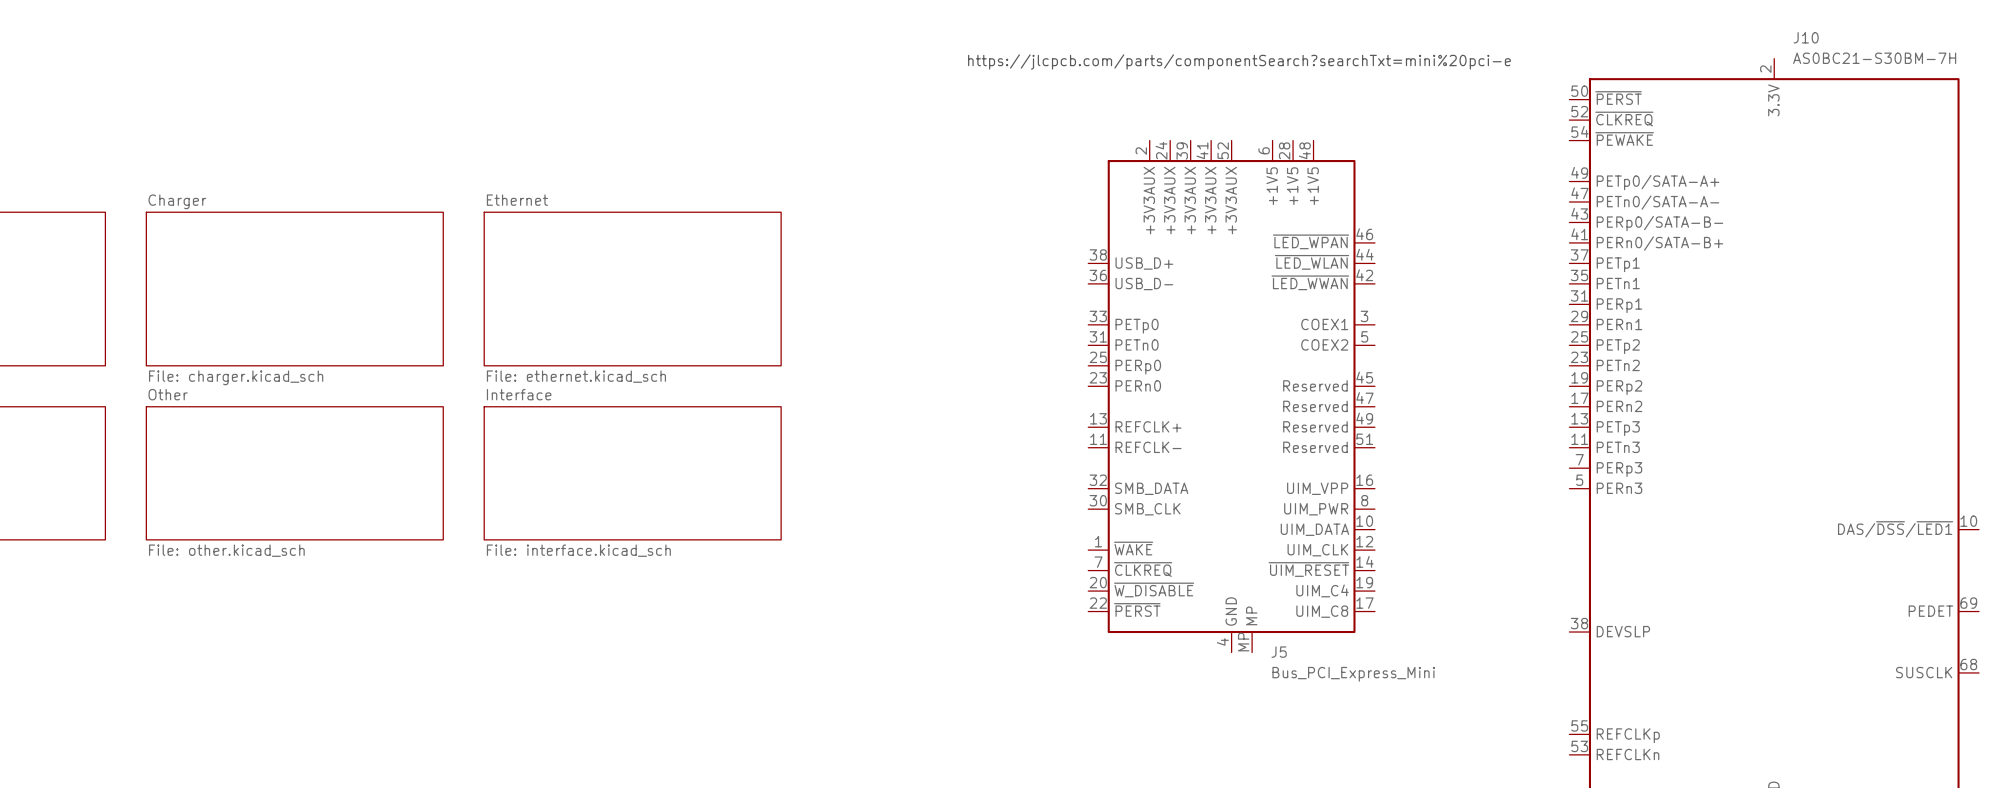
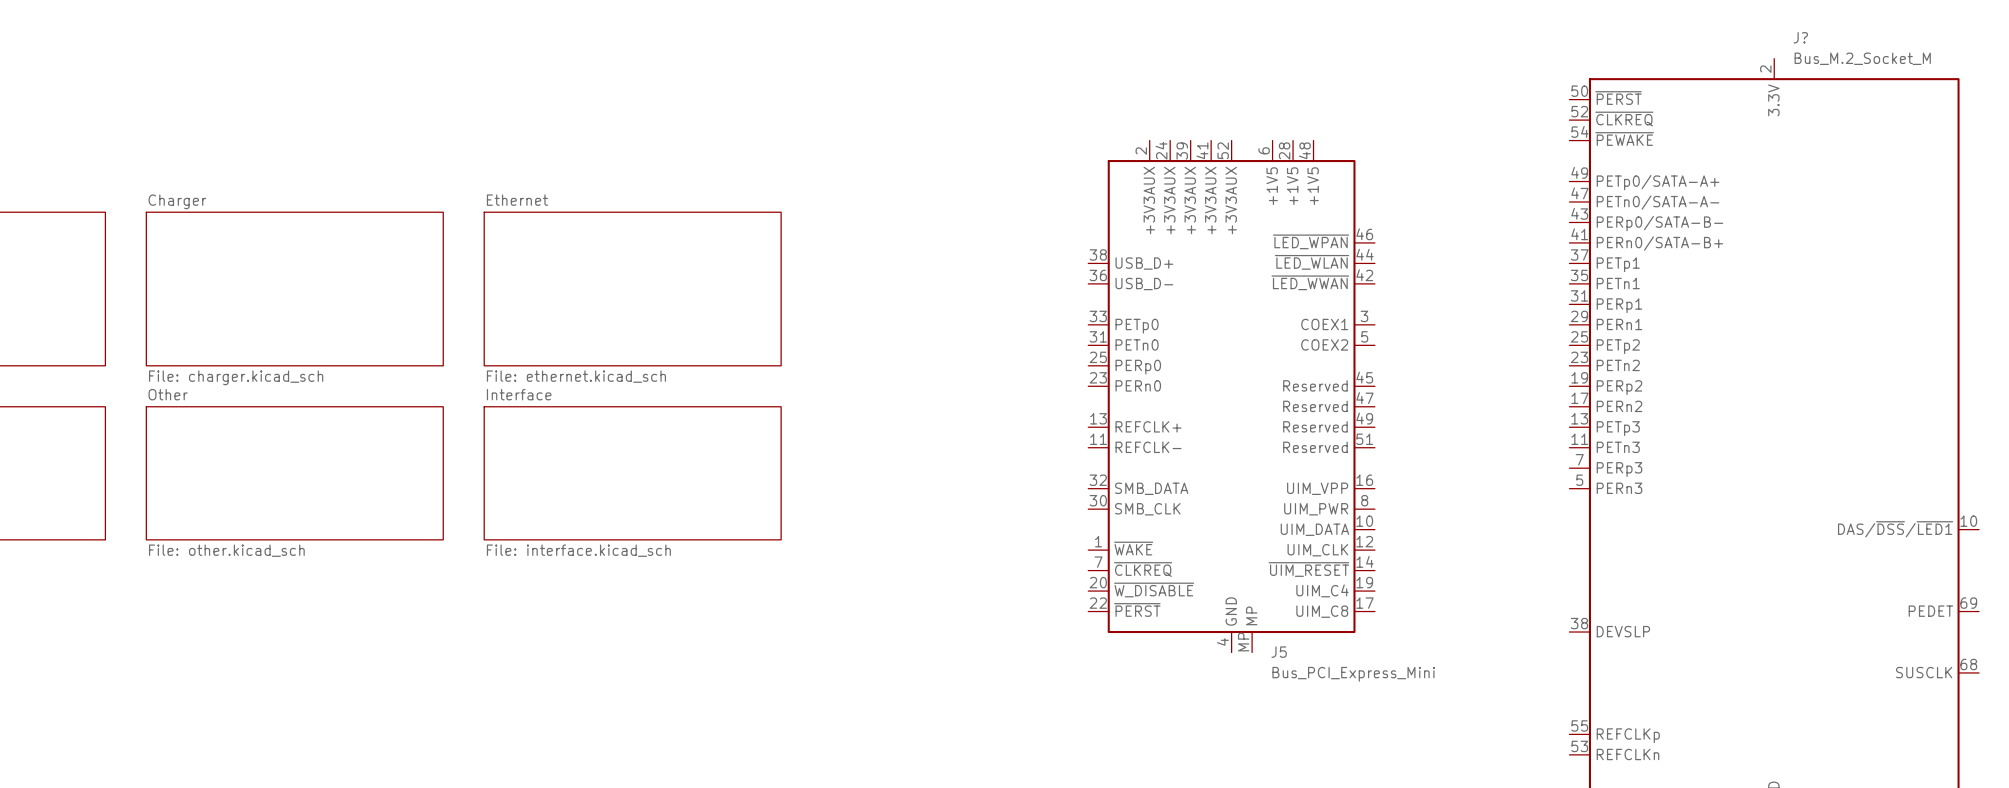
J10 name: J10 (1806, 37) -> J? (1800, 37)
J10 value: AS0BC21-S30BM-7H (1874, 58) -> Bus_M.2_Socket_M (1862, 58)
text: https://jlcpcb.com/parts/componentSearch?searchTxt=mini%20pci-e (1239, 61) -> none

